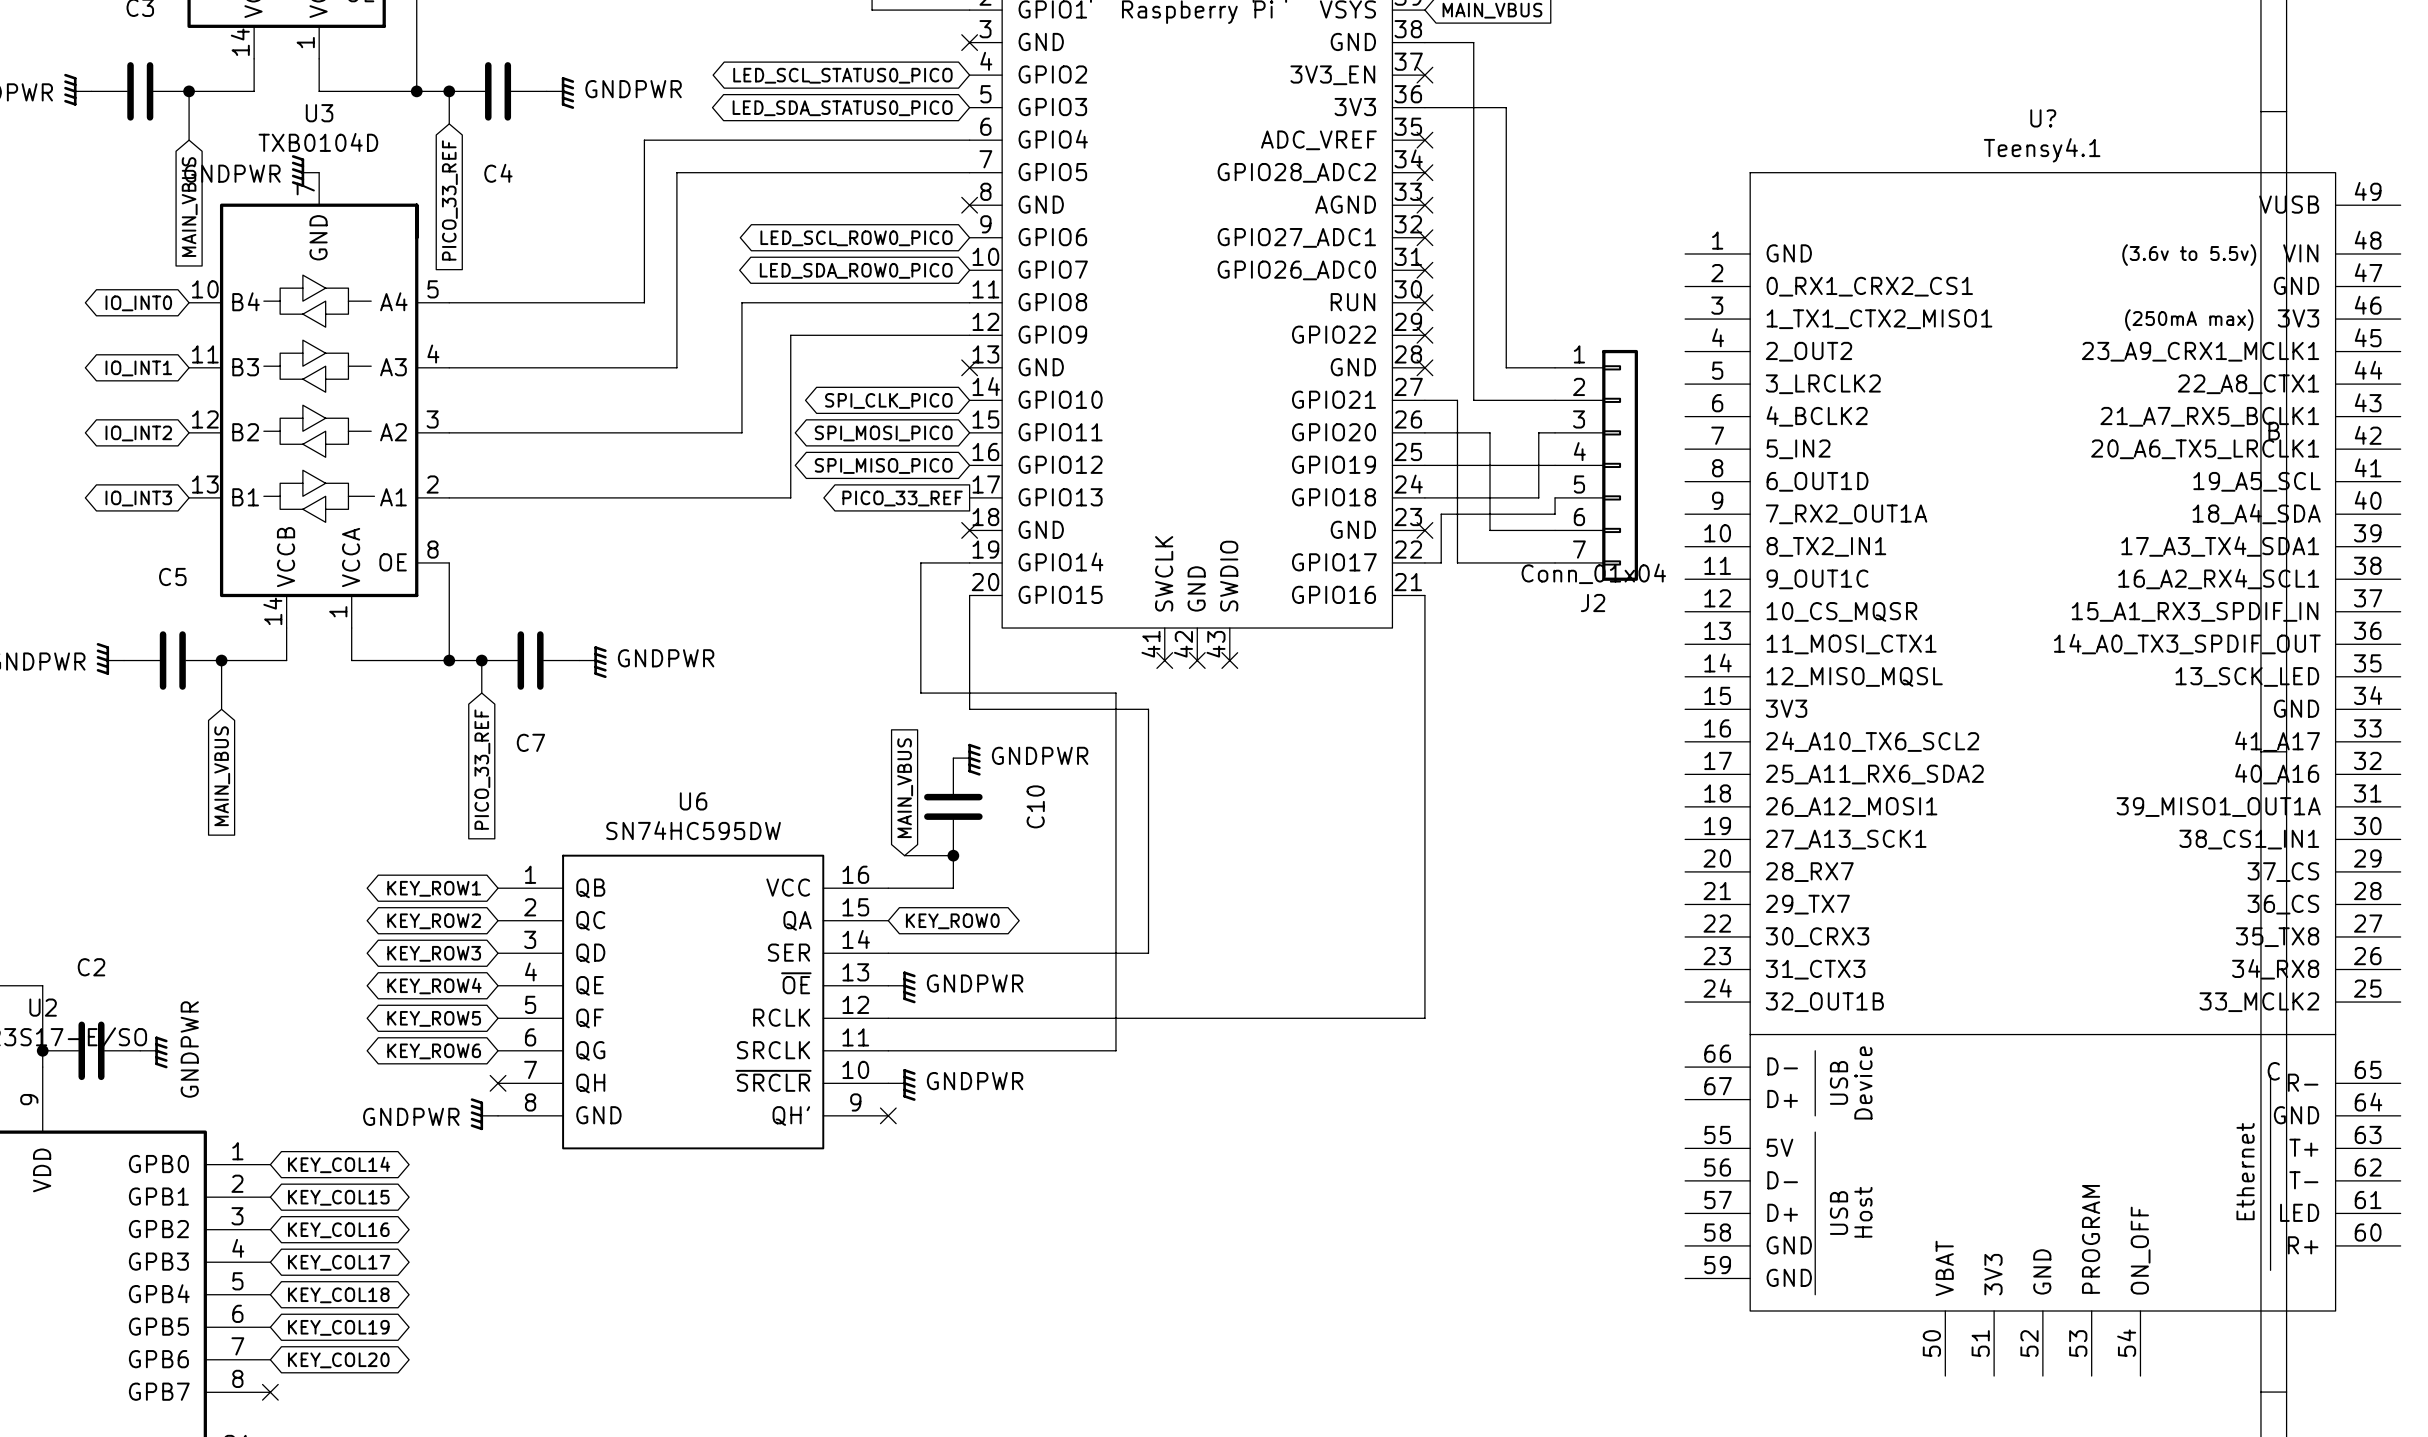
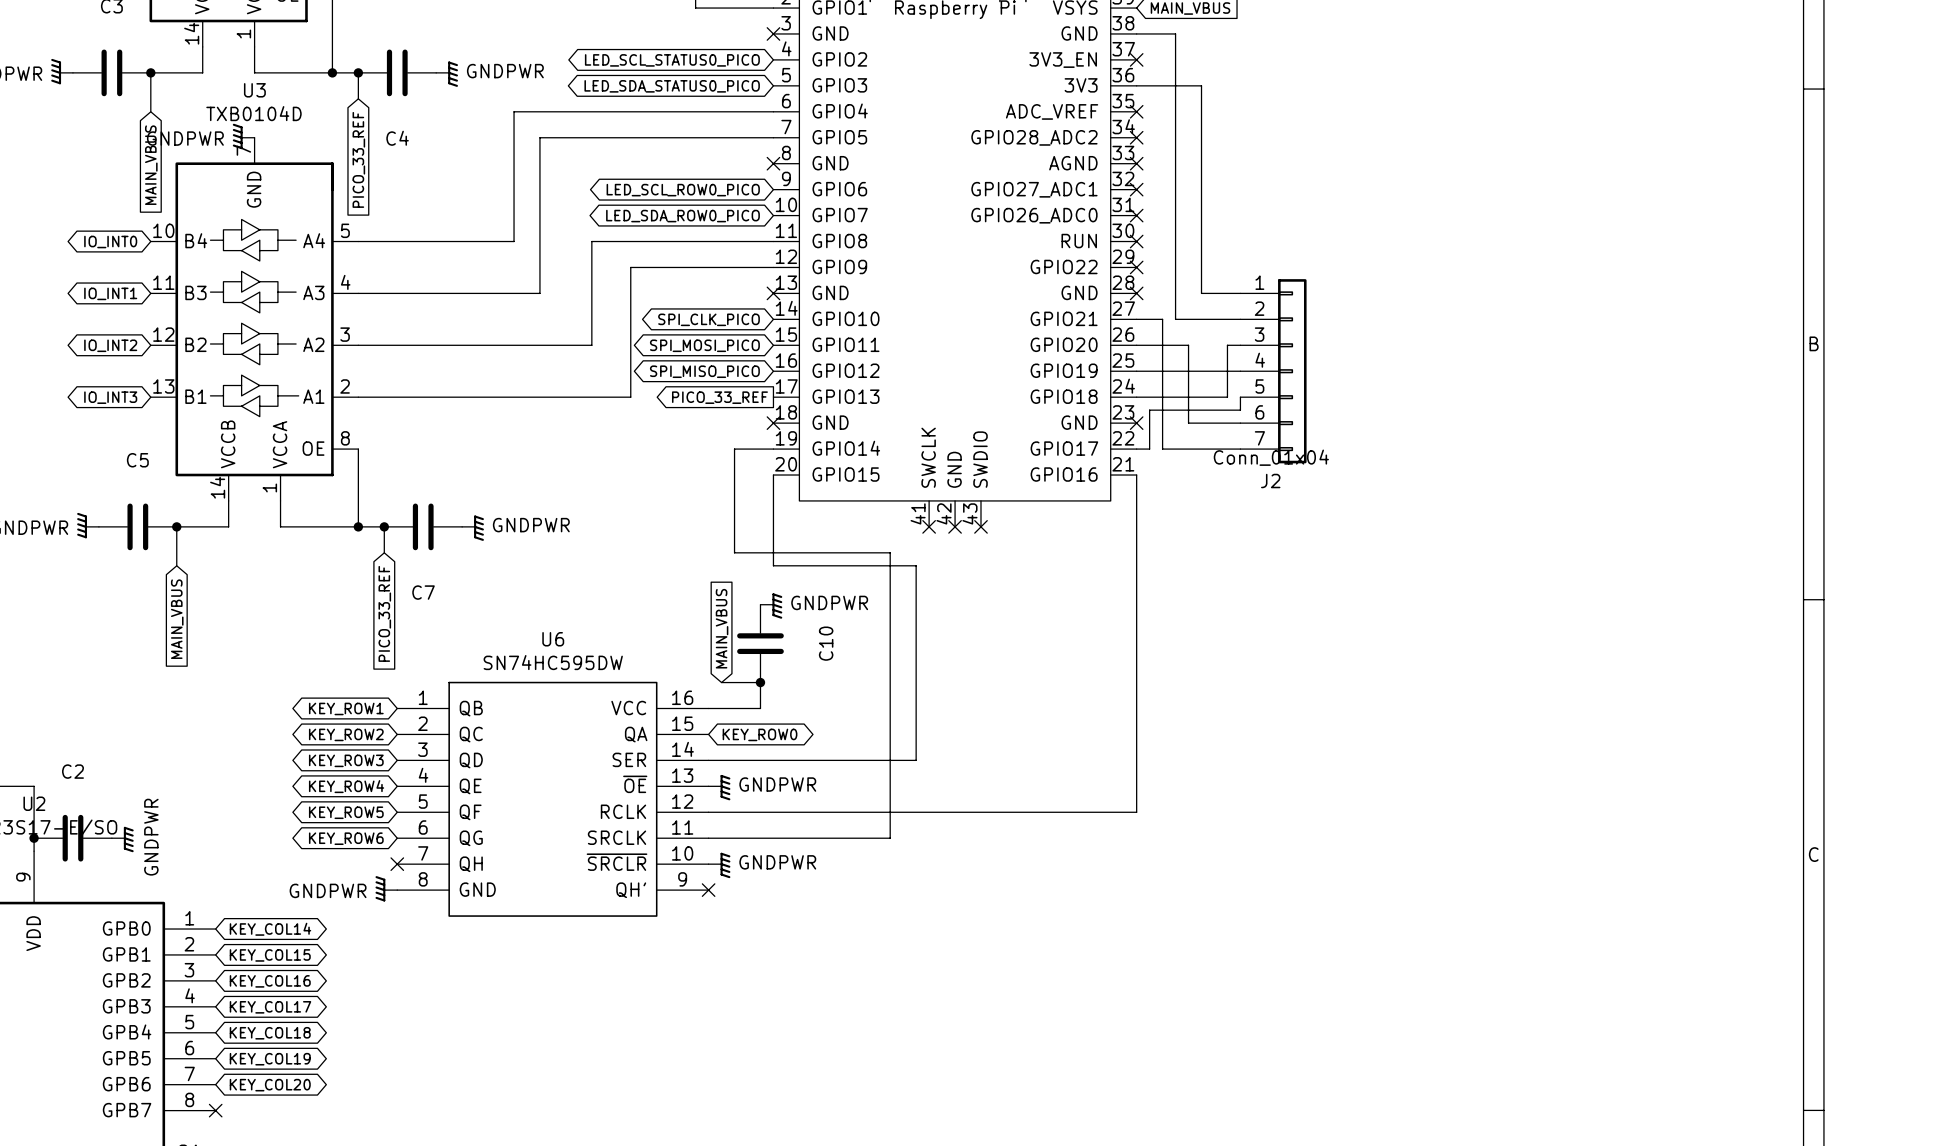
U?: Teensy4.1 (2042, 774) -> none

